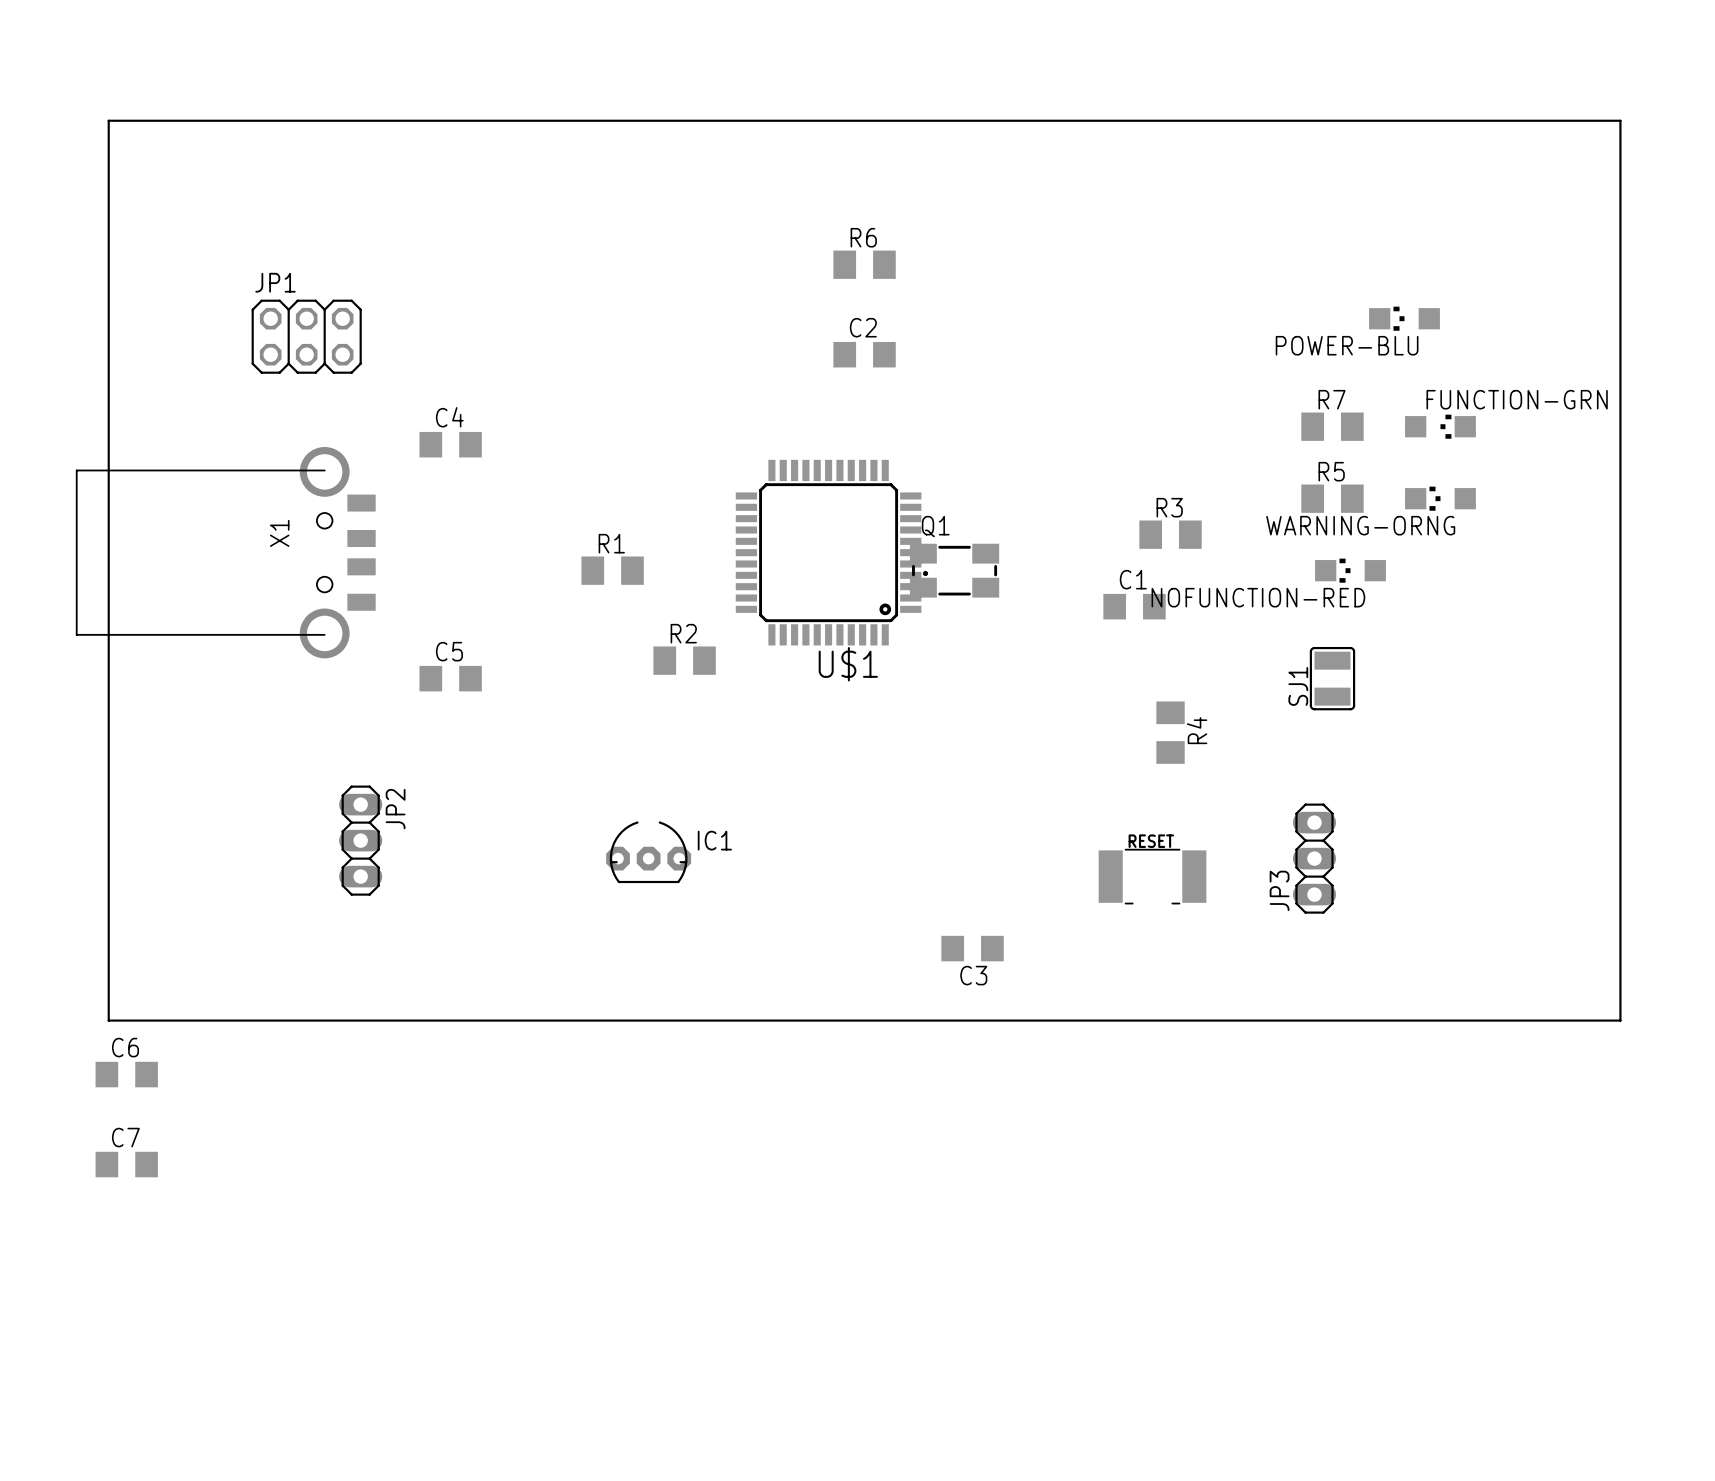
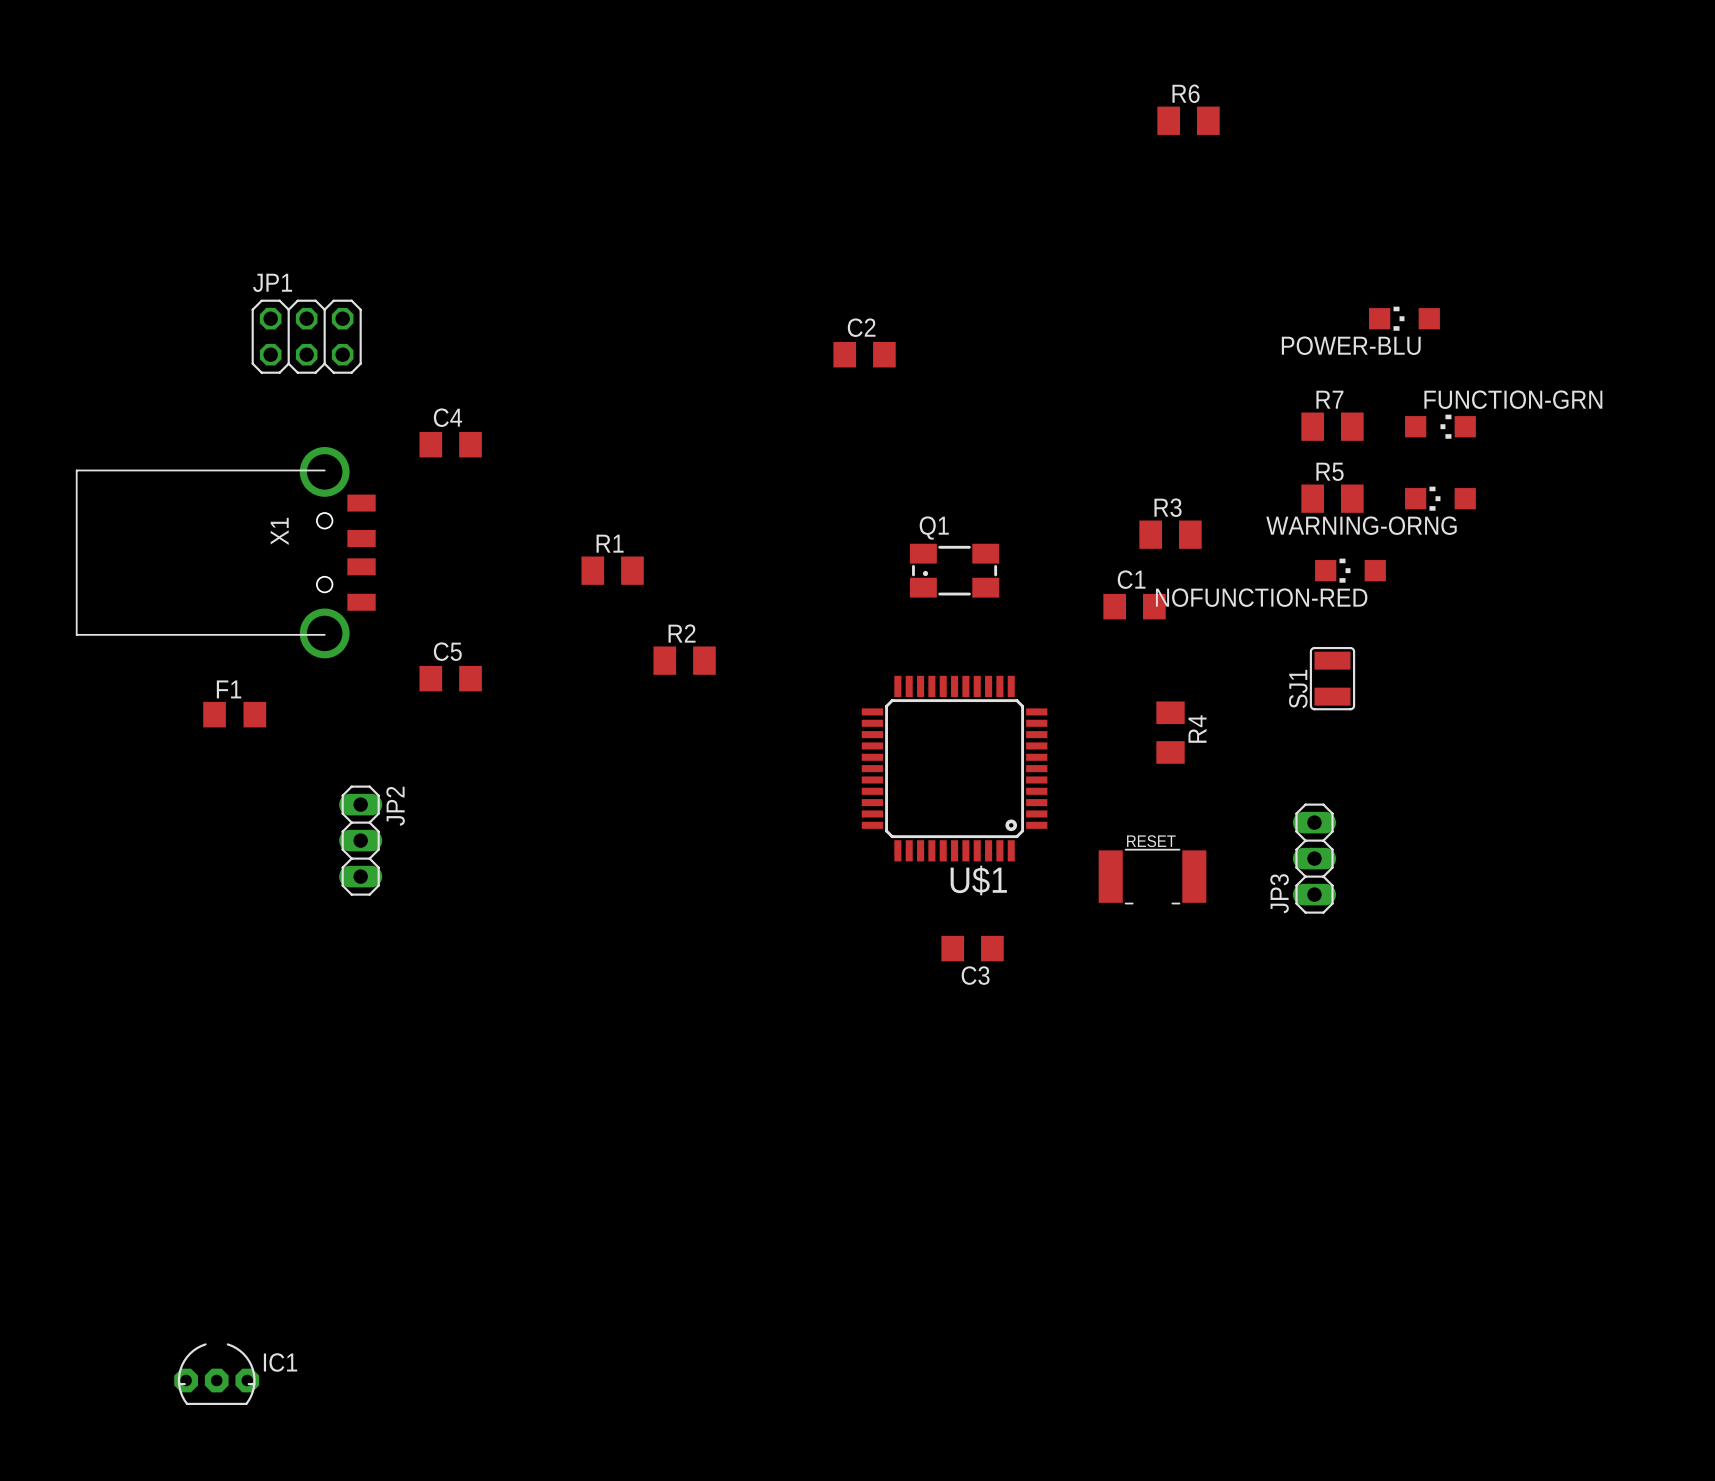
board edge: (108, 120) (108, 1020) (1620, 1020) (1620, 120) (108, 120) -> none
R6 position: (864, 264) -> (1188, 120)
U$1 position: (828, 552) -> (954, 768)
F1: none -> (234, 714)
IC1 position: (648, 852) -> (216, 1374)
C6: (126, 1074) -> none
C7: (126, 1164) -> none

